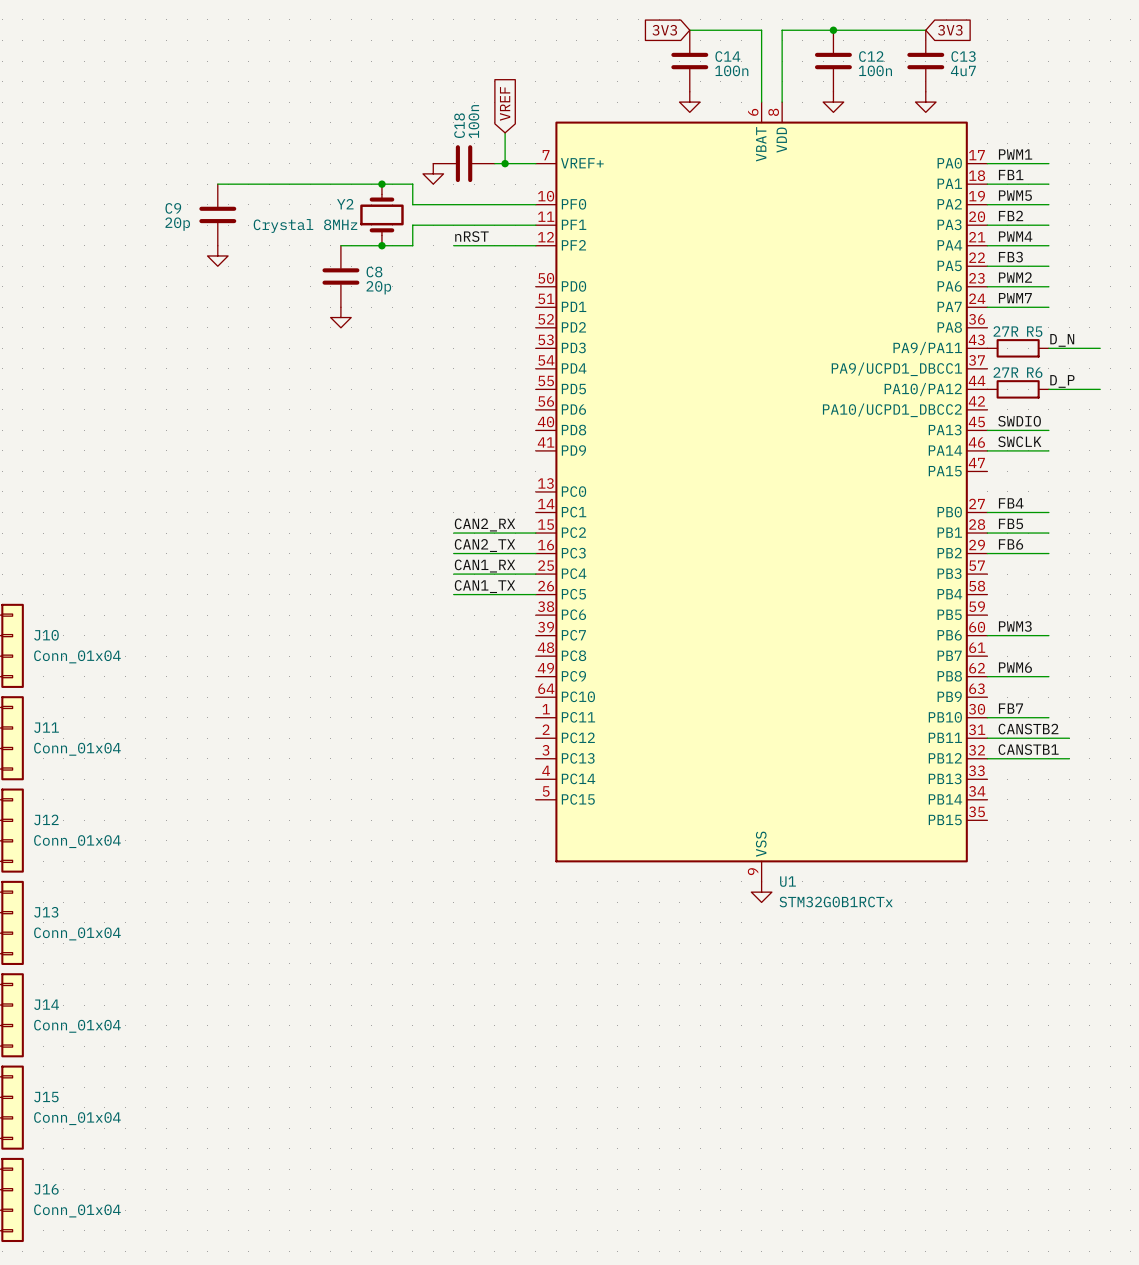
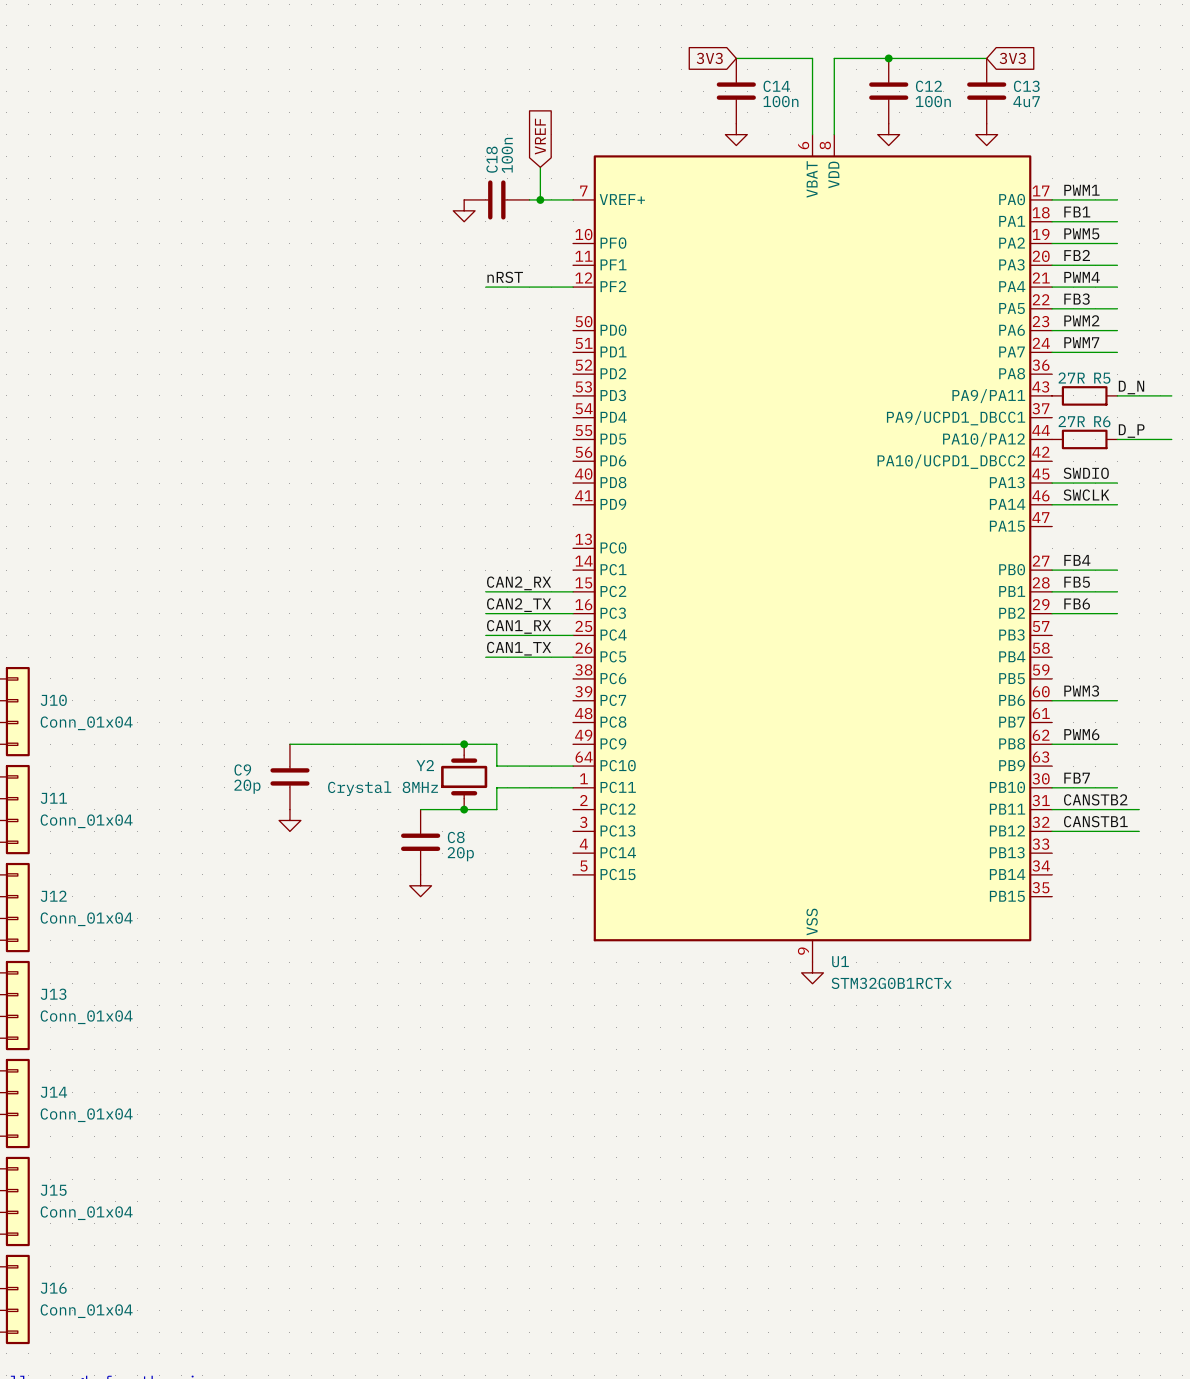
wire: (217, 184) (412, 184) (412, 204) (535, 204) -> none
junction: (381, 184) -> none
C9 position: (217, 214) -> (289, 776)
Y2 position: (381, 214) -> (464, 776)
wire: (535, 225) (412, 225) (412, 245) (340, 245) -> none
junction: (381, 245) -> none
power symbol: (217, 255) -> none
C8 position: (340, 276) -> (420, 842)
power symbol: (340, 317) -> none
wire: none -> (289, 744) (496, 744) (496, 766) (573, 766)
junction: none -> (464, 744)
wire: none -> (573, 787) (496, 787) (496, 809) (420, 809)
junction: none -> (464, 809)
power symbol: none -> (289, 820)
power symbol: none -> (420, 885)

